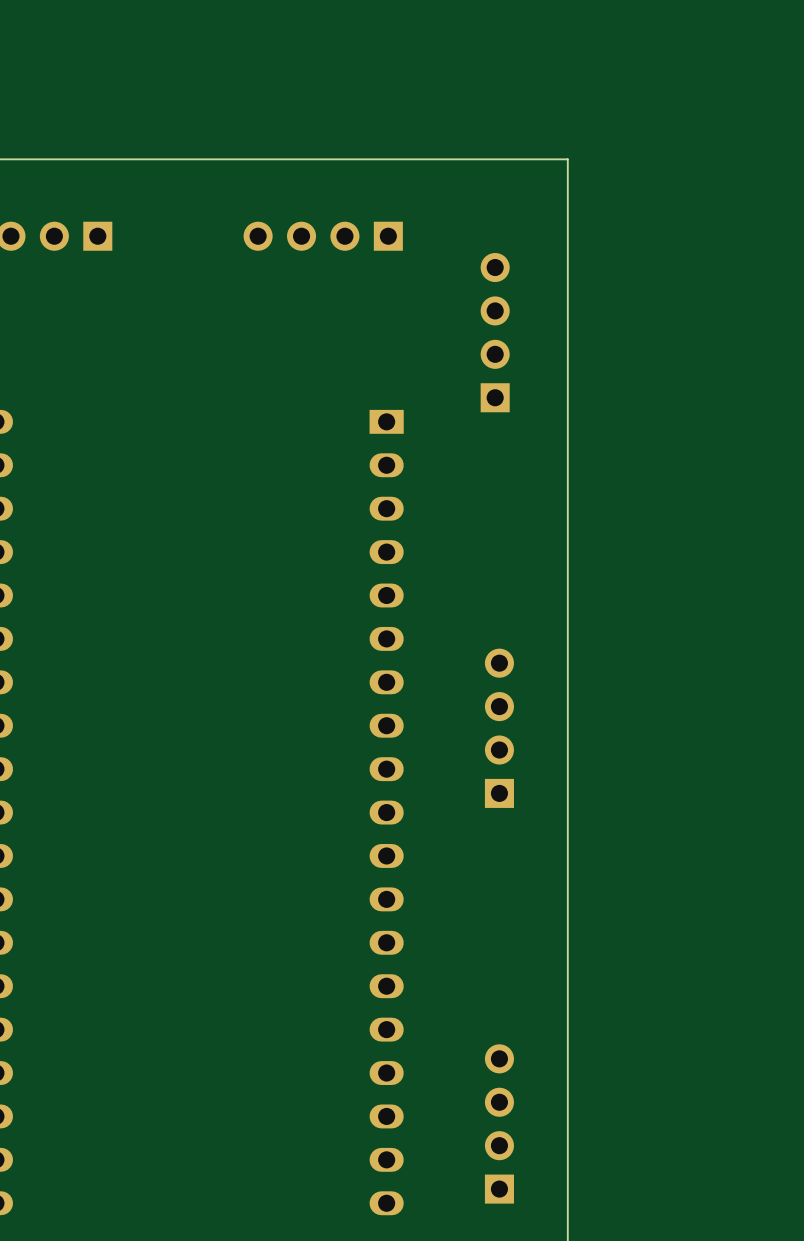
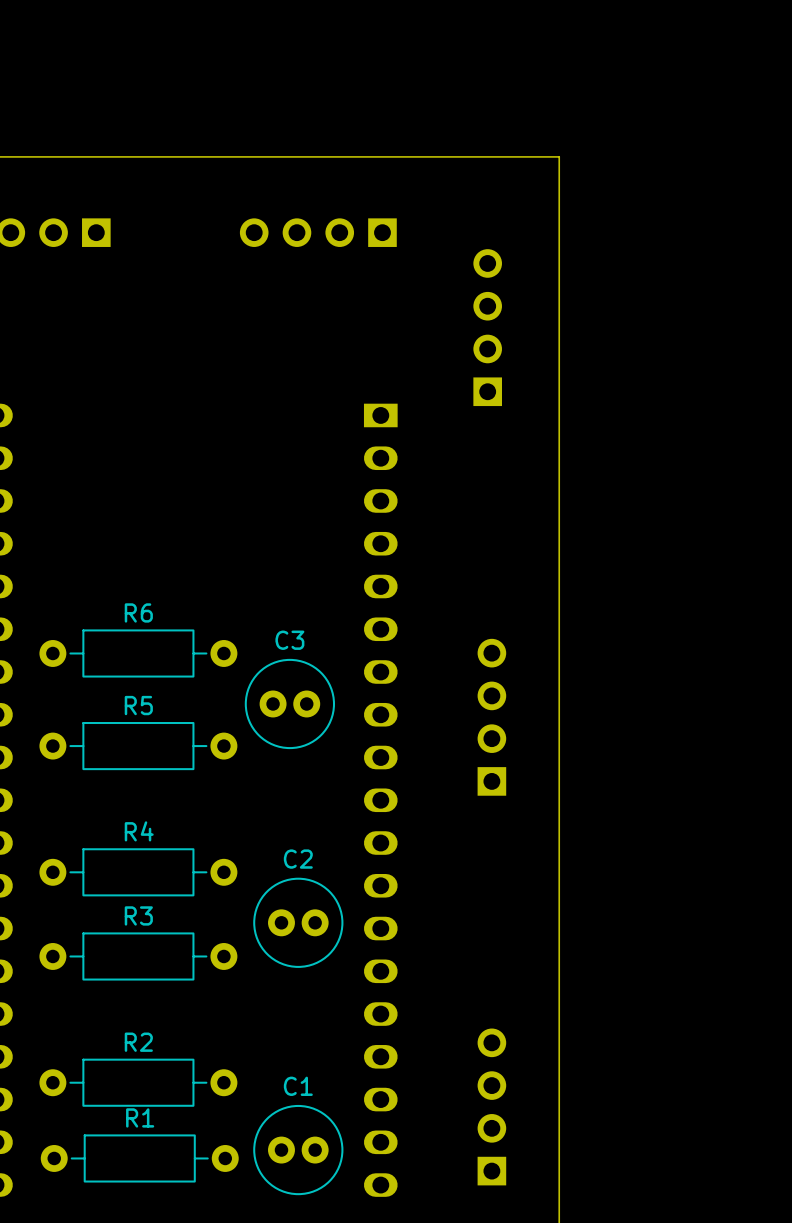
R6: none -> (138, 653)
C3: none -> (289, 703)
R5: none -> (138, 746)
R4: none -> (138, 872)
C2: none -> (298, 922)
R3: none -> (138, 956)
R2: none -> (138, 1082)
C1: none -> (298, 1150)
R1: none -> (139, 1158)

